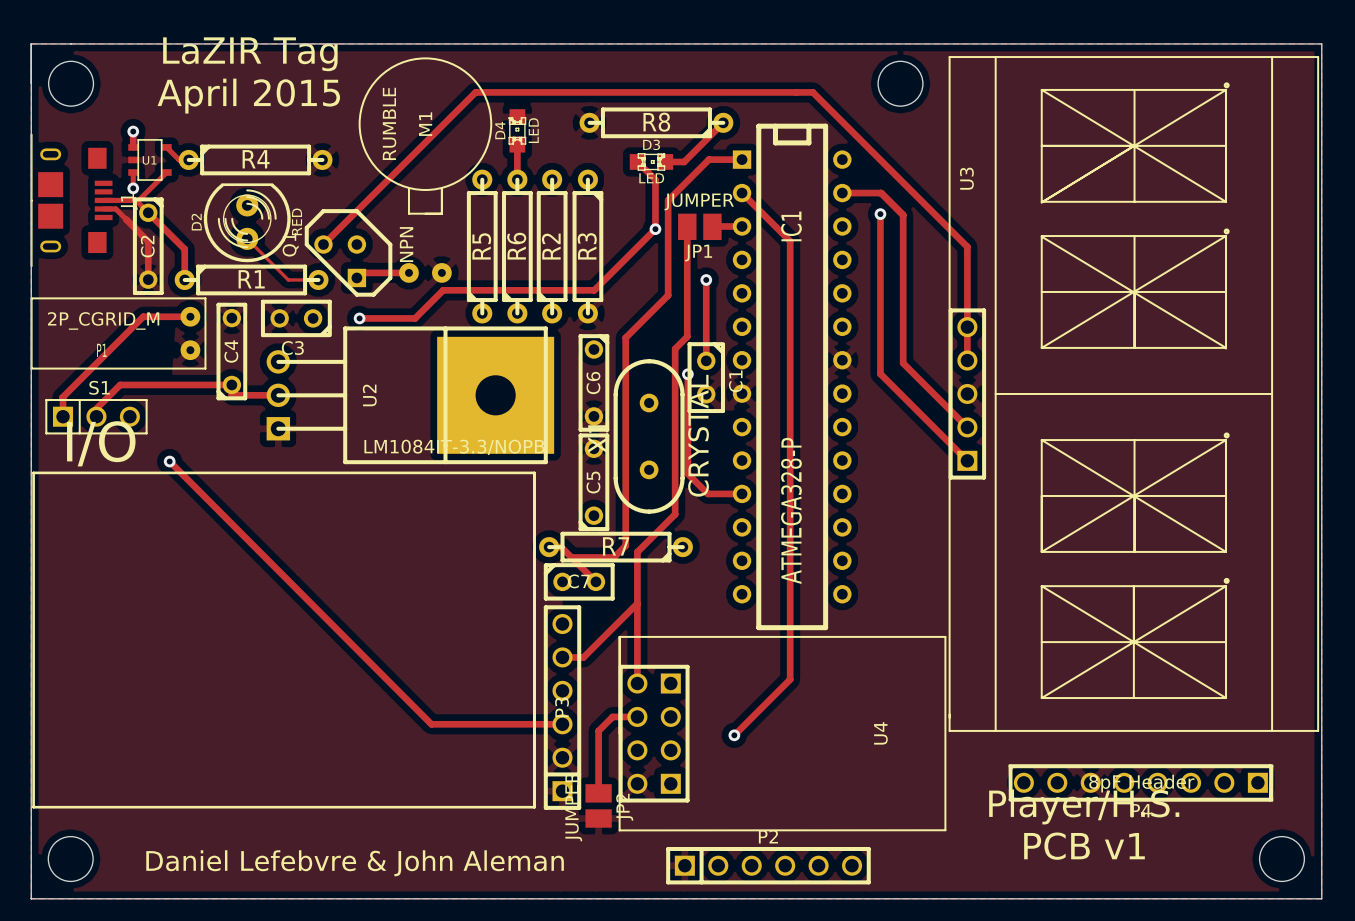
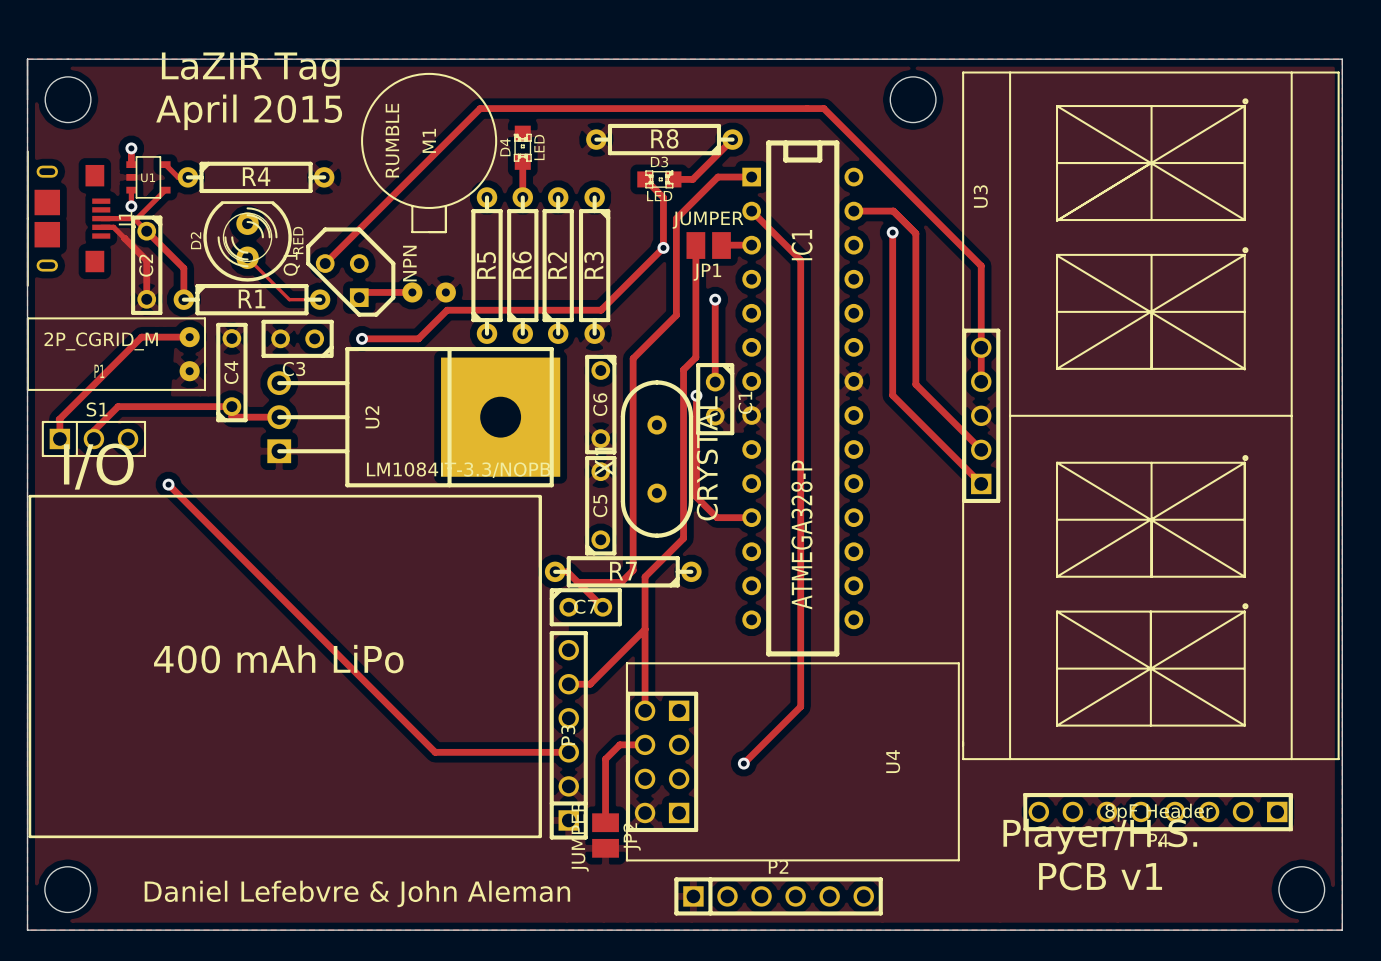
text: none -> 400 mAh LiPo (278, 659)

